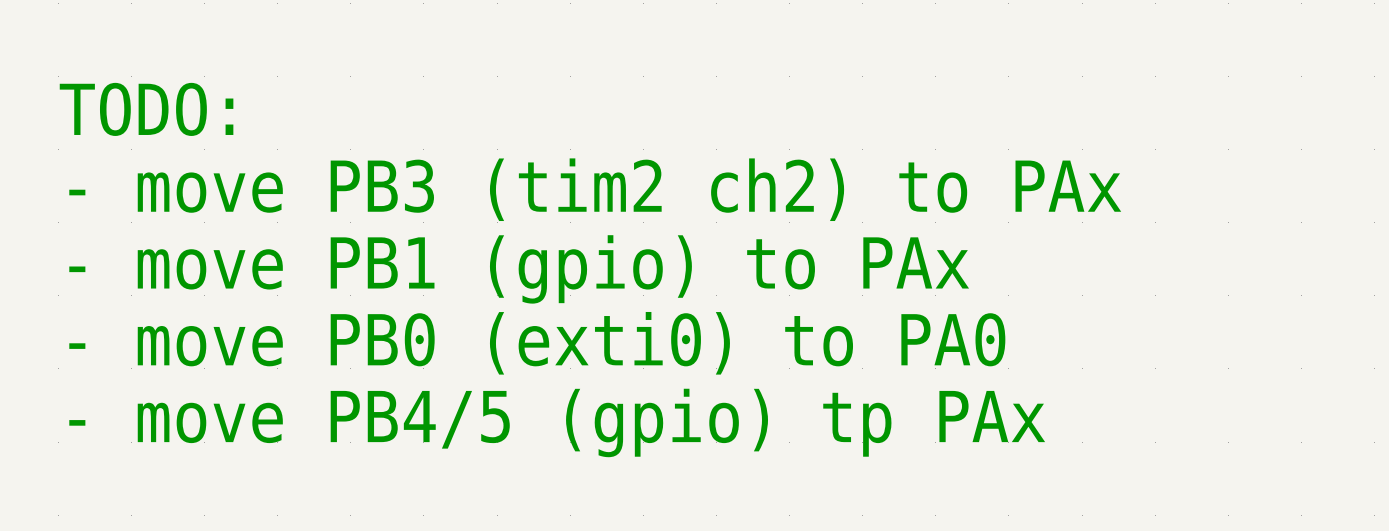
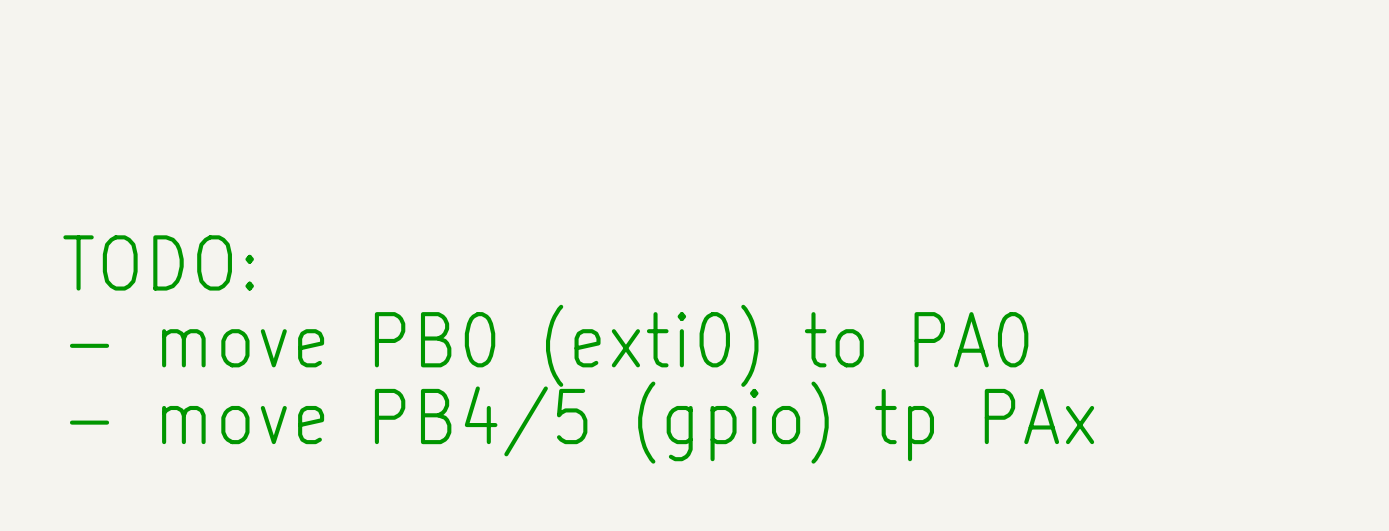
text: TODO: (146, 109) -> none
text: - move PB3 (tim2 ch2) to PAx (595, 189) -> none
text: - move PB1 (gpio) to PAx (519, 269) -> TODO: (158, 262)

